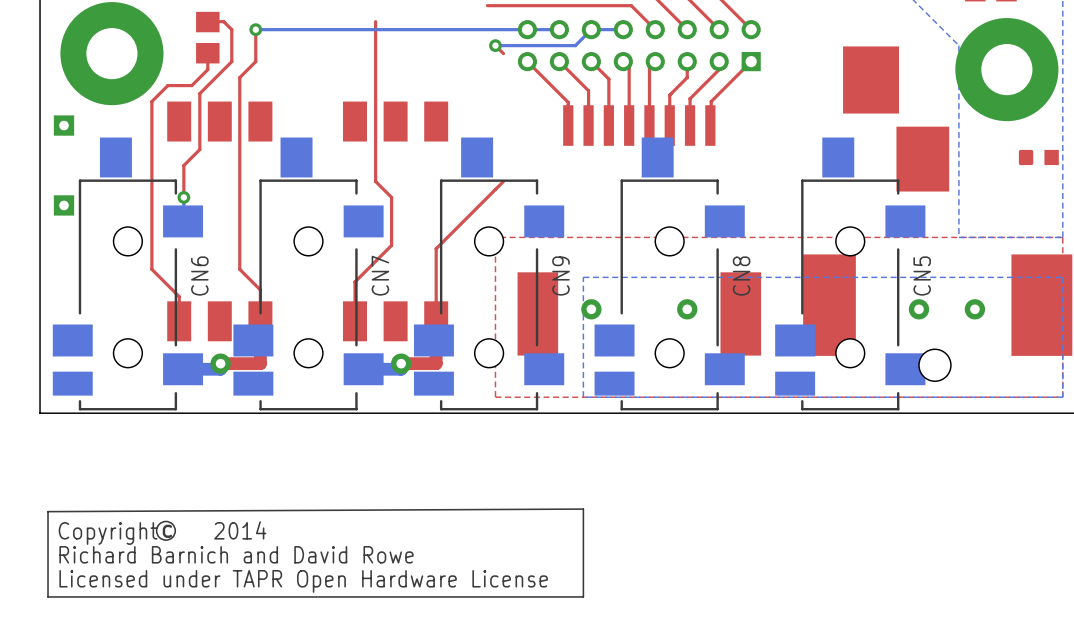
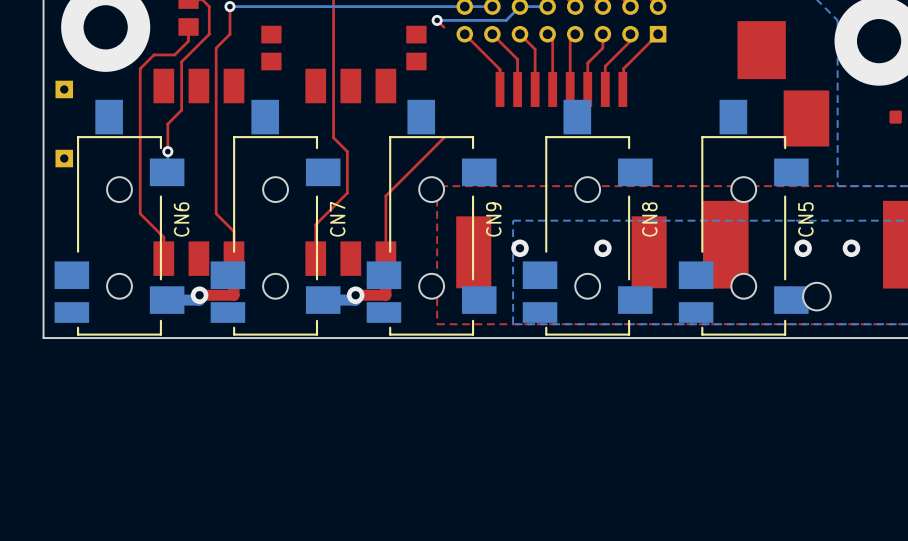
part: none -> (271, 48)
part: none -> (416, 48)
line: (583, 509) (48, 511) (48, 596) (583, 596) (583, 509) -> none
drawing: [155, 520, 177, 541] -> none
text: c (167, 531) -> none
text: Copyright 2014 (162, 533) -> none
text: Richard Barnich and David Rowe (236, 554) -> none
text: Licensed under TAPR Open Hardware License (303, 581) -> none

